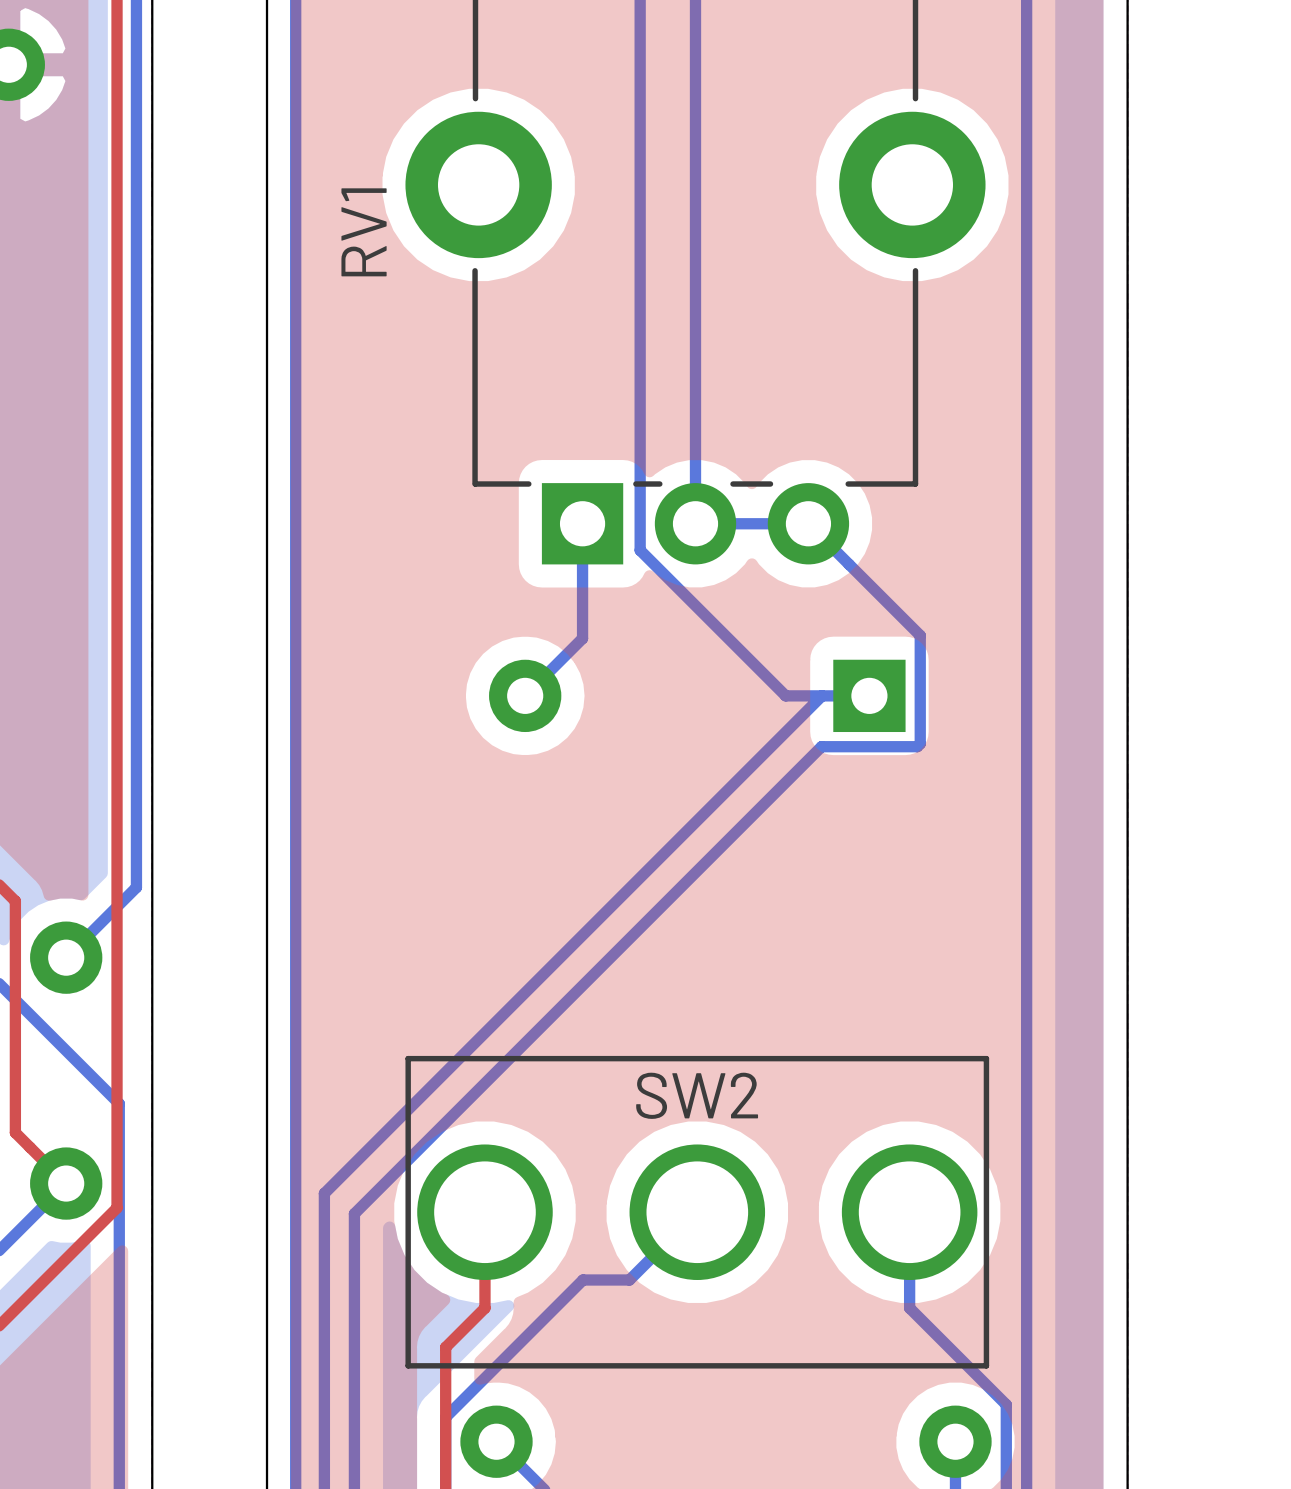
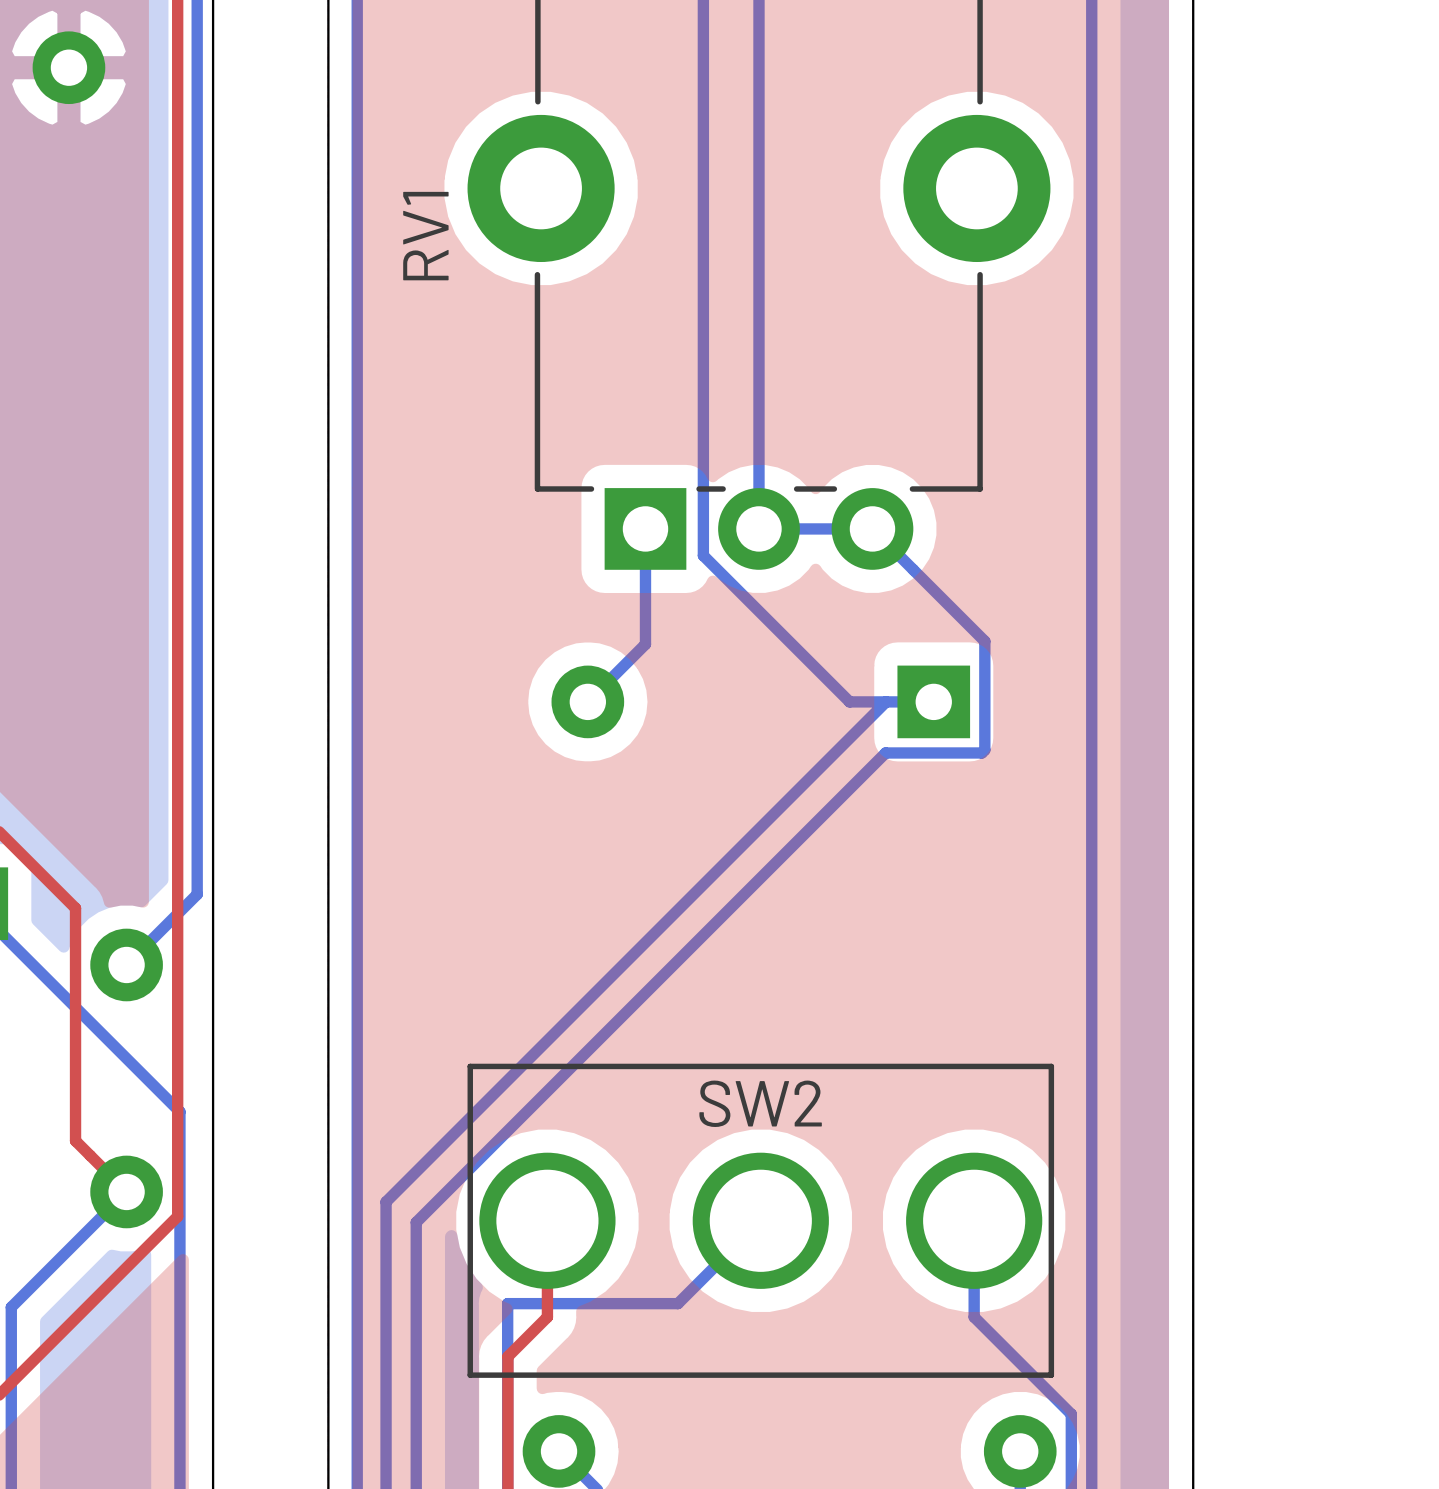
bottom track: (629, 1280) (583, 1280) (445, 1417) -> (692, 1288) (677, 1303) (507, 1303) (507, 1426)

